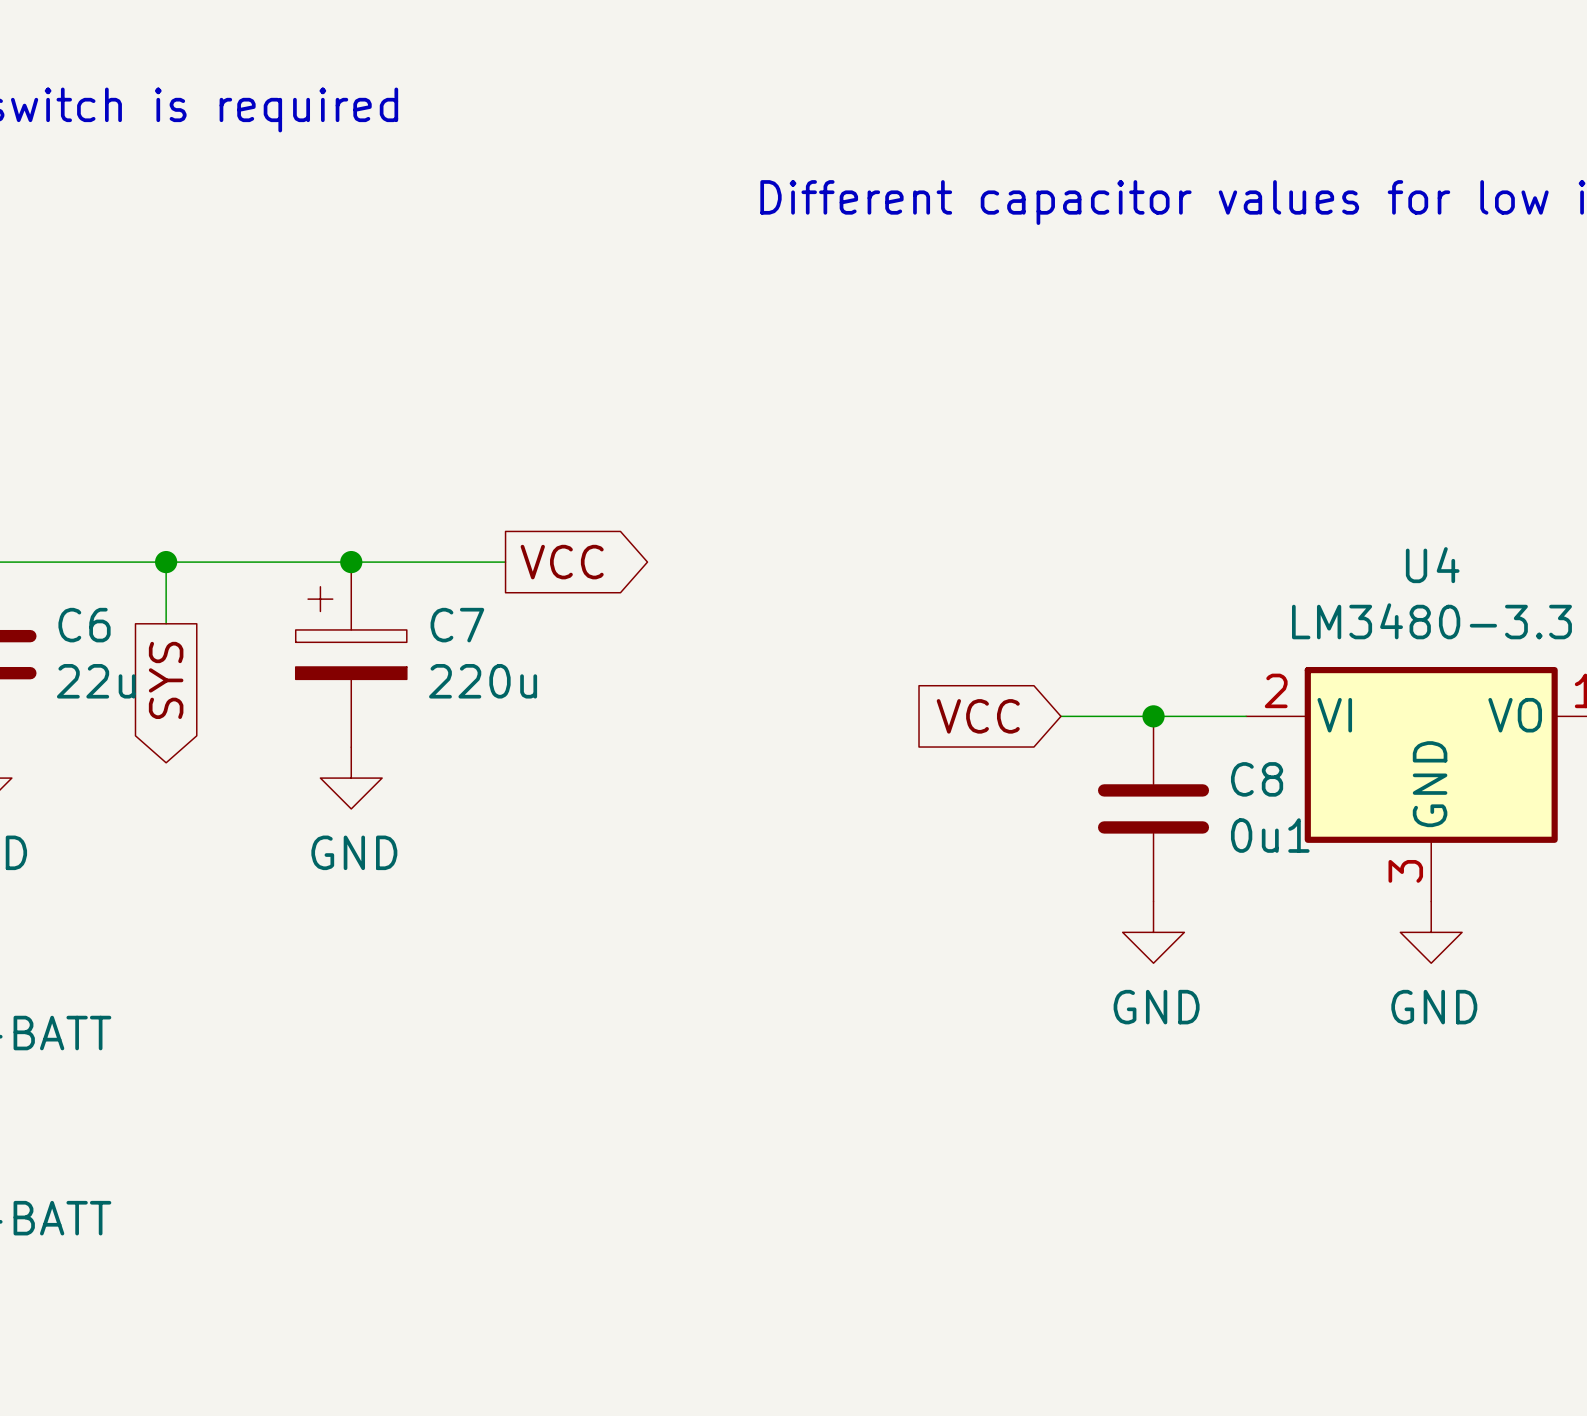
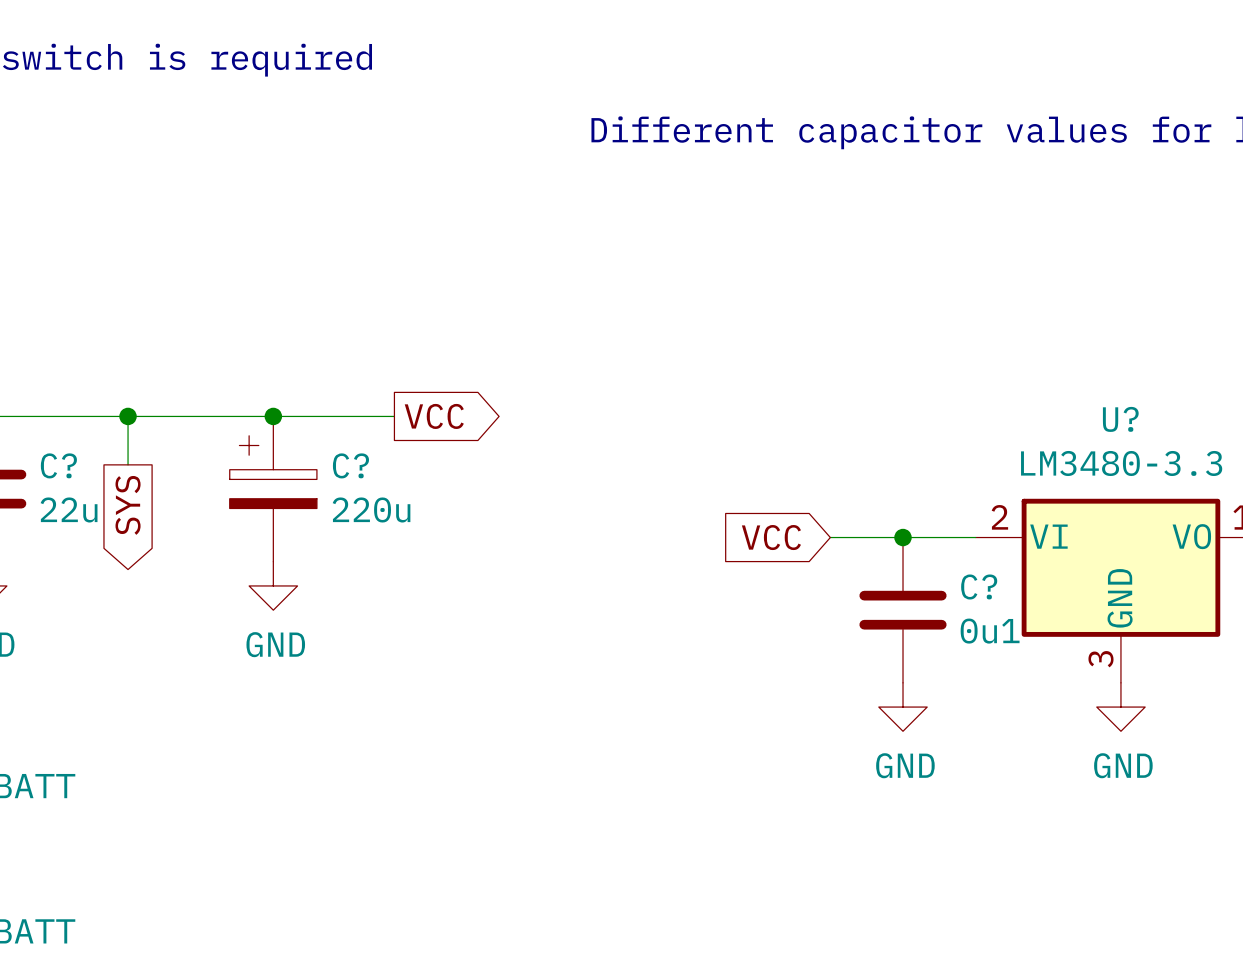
U4 name: U4 (1432, 565) -> U? (1120, 419)
C6 name: C6 (84, 625) -> C? (58, 465)
C7 name: C7 (457, 625) -> C? (350, 465)
C8 name: C8 (1257, 779) -> C? (979, 587)

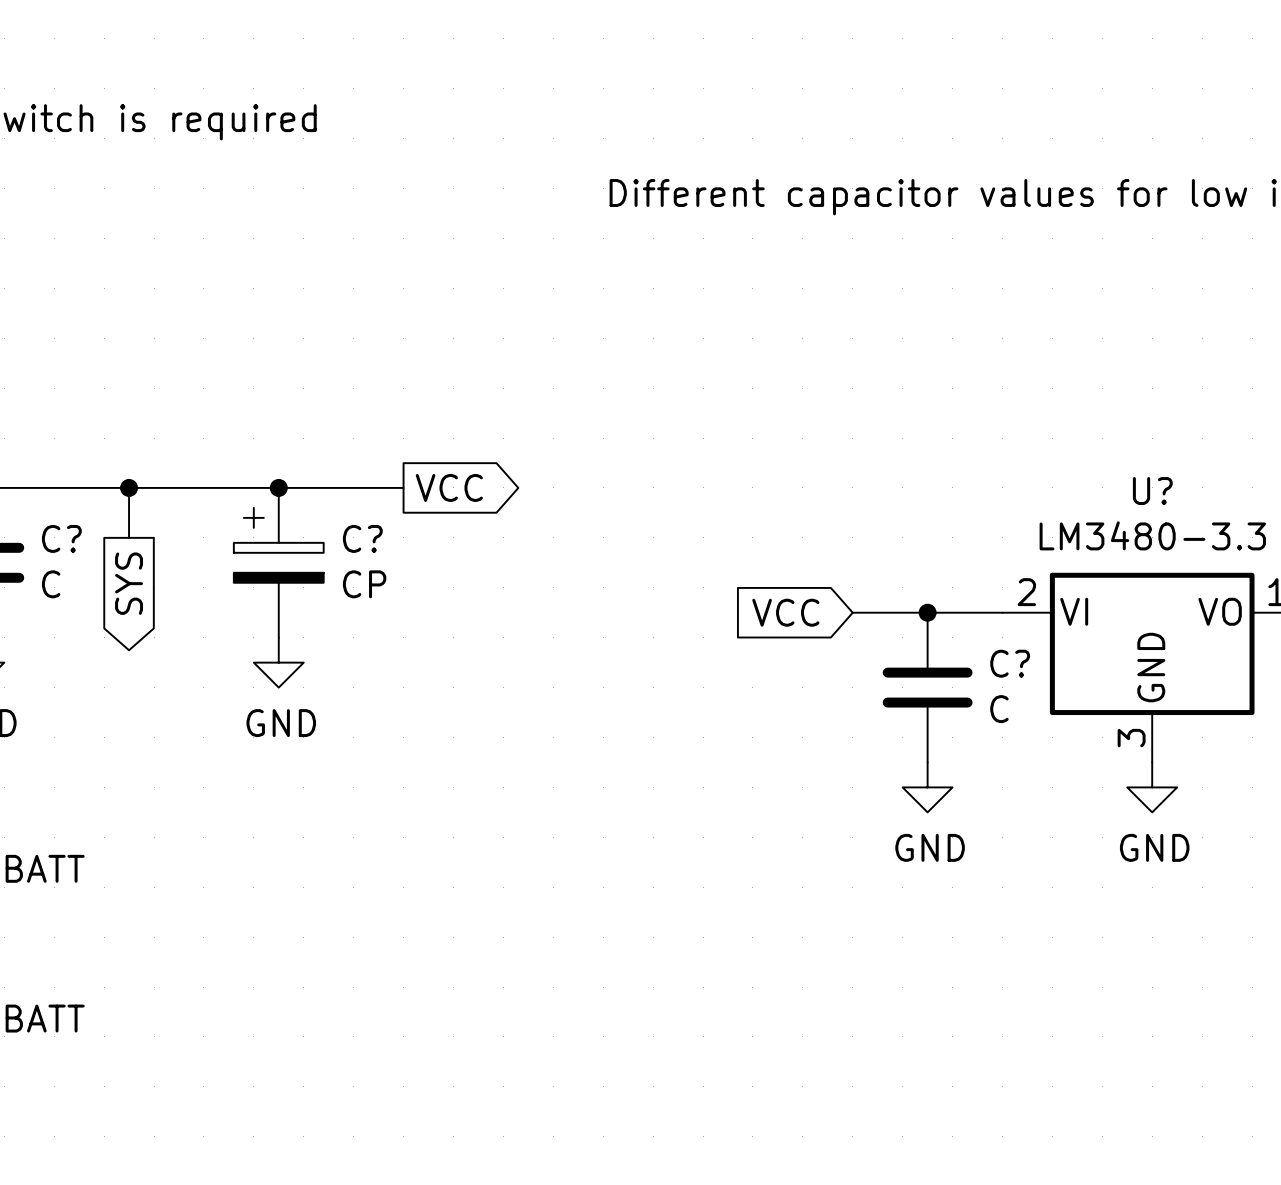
C? value: 22u (69, 509) -> C (51, 584)
C? value: 220u (371, 509) -> CP (364, 584)
C? value: 0u1 (990, 631) -> C (999, 709)

